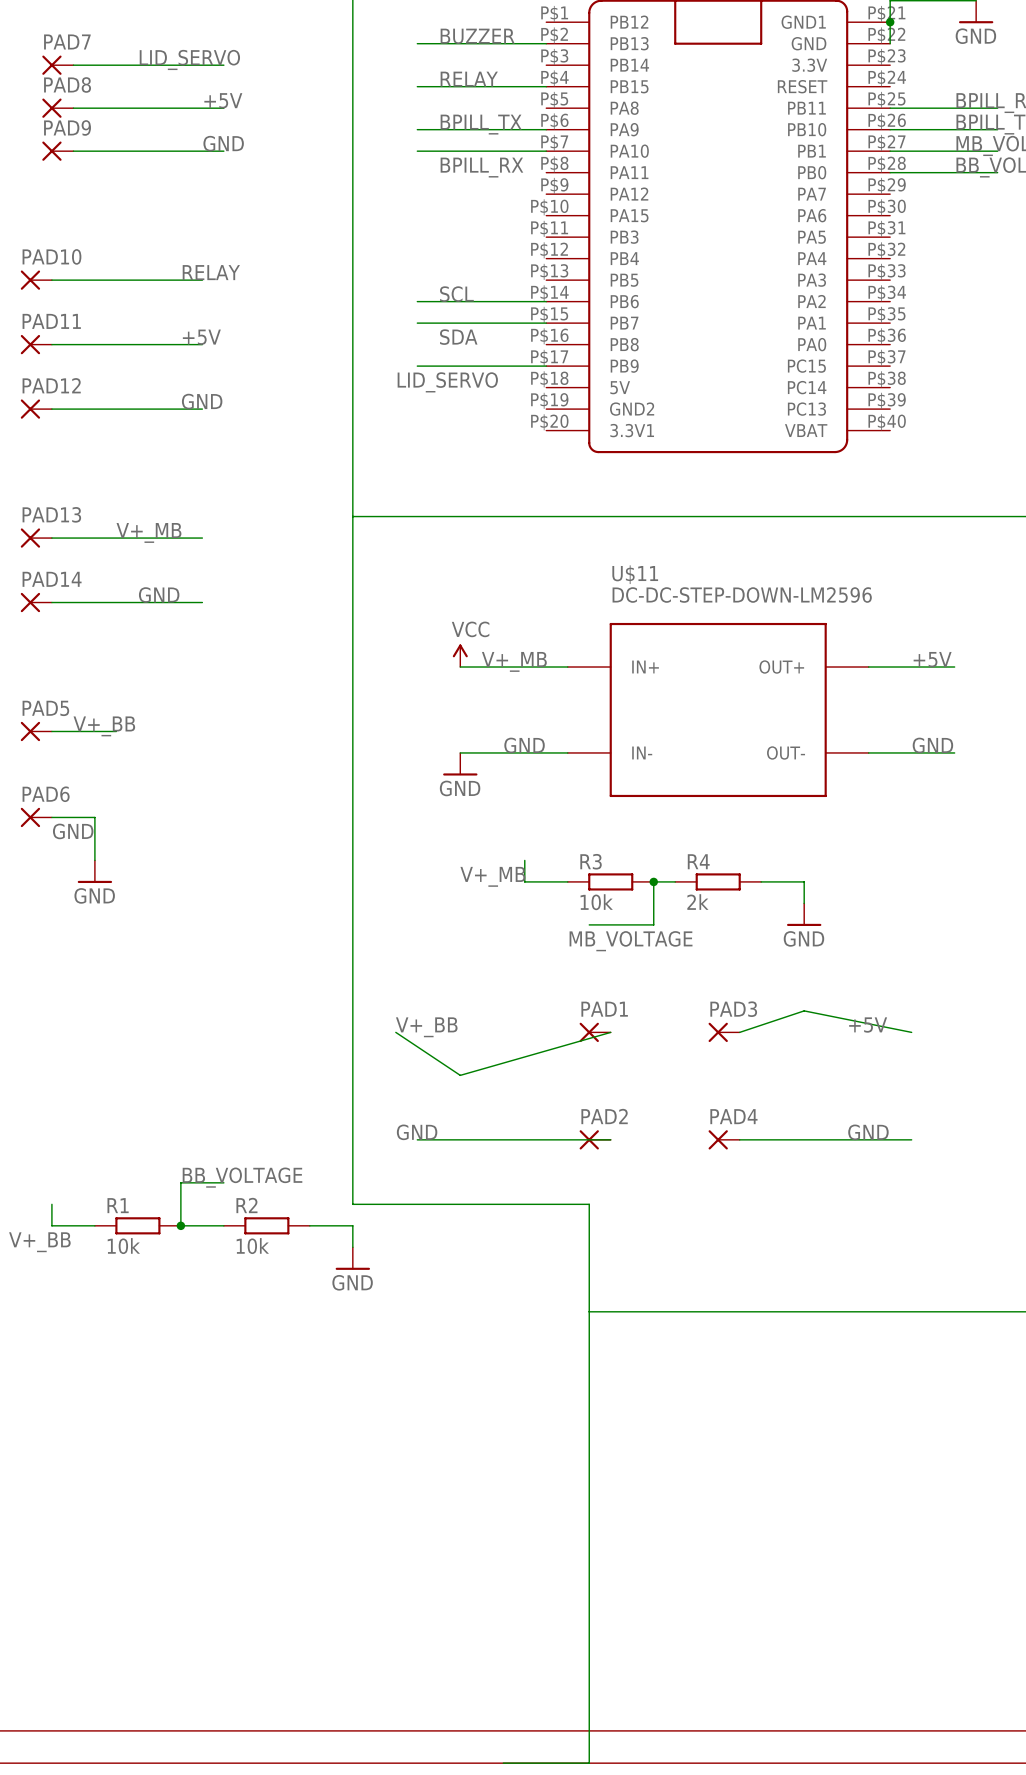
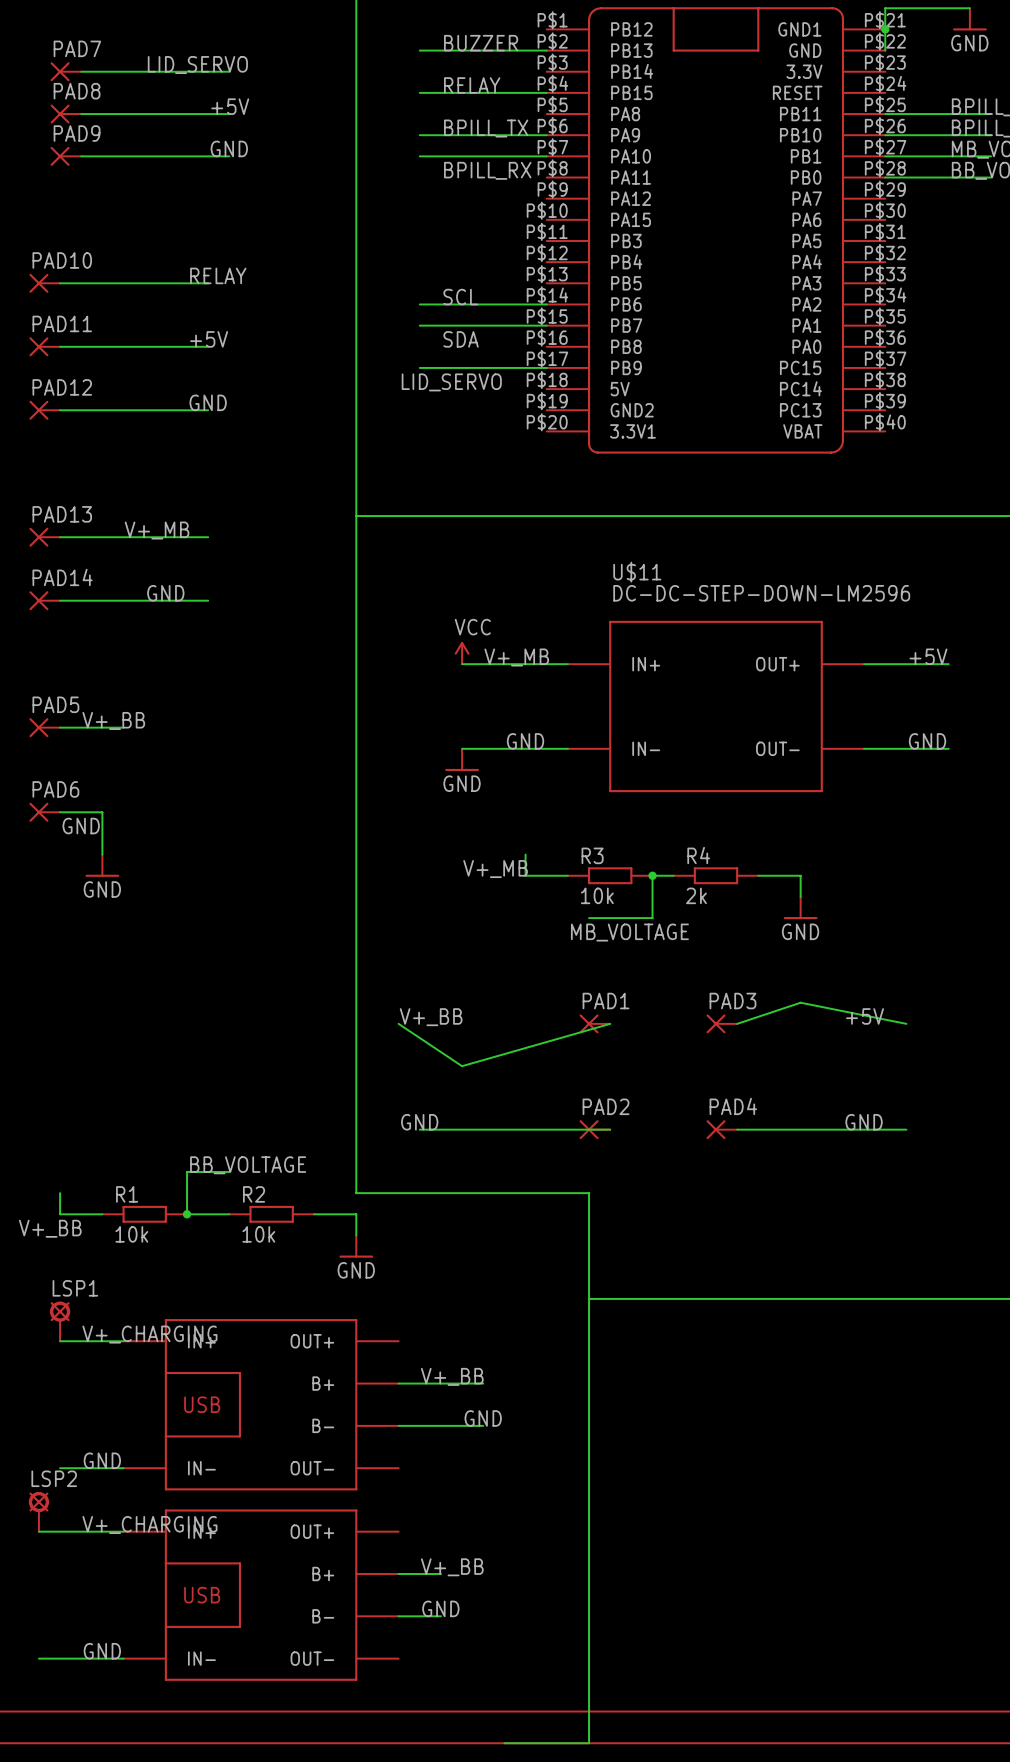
LSP1: none -> (60, 1321)
label: none -> V+_CHARGING (149, 1334)
wire: none -> (60, 1341) (123, 1341)
label: none -> V+_BB (452, 1376)
wire: none -> (398, 1383) (483, 1383)
part: none -> (261, 1404)
label: none -> GND (483, 1418)
wire: none -> (398, 1425) (483, 1425)
label: none -> GND (102, 1460)
wire: none -> (60, 1468) (123, 1468)
LSP2: none -> (38, 1511)
label: none -> V+_CHARGING (149, 1524)
wire: none -> (38, 1531) (123, 1531)
label: none -> V+_BB (452, 1567)
wire: none -> (398, 1573) (440, 1573)
part: none -> (261, 1595)
label: none -> GND (440, 1608)
wire: none -> (398, 1616) (440, 1616)
label: none -> GND (102, 1651)
wire: none -> (38, 1658) (123, 1658)

